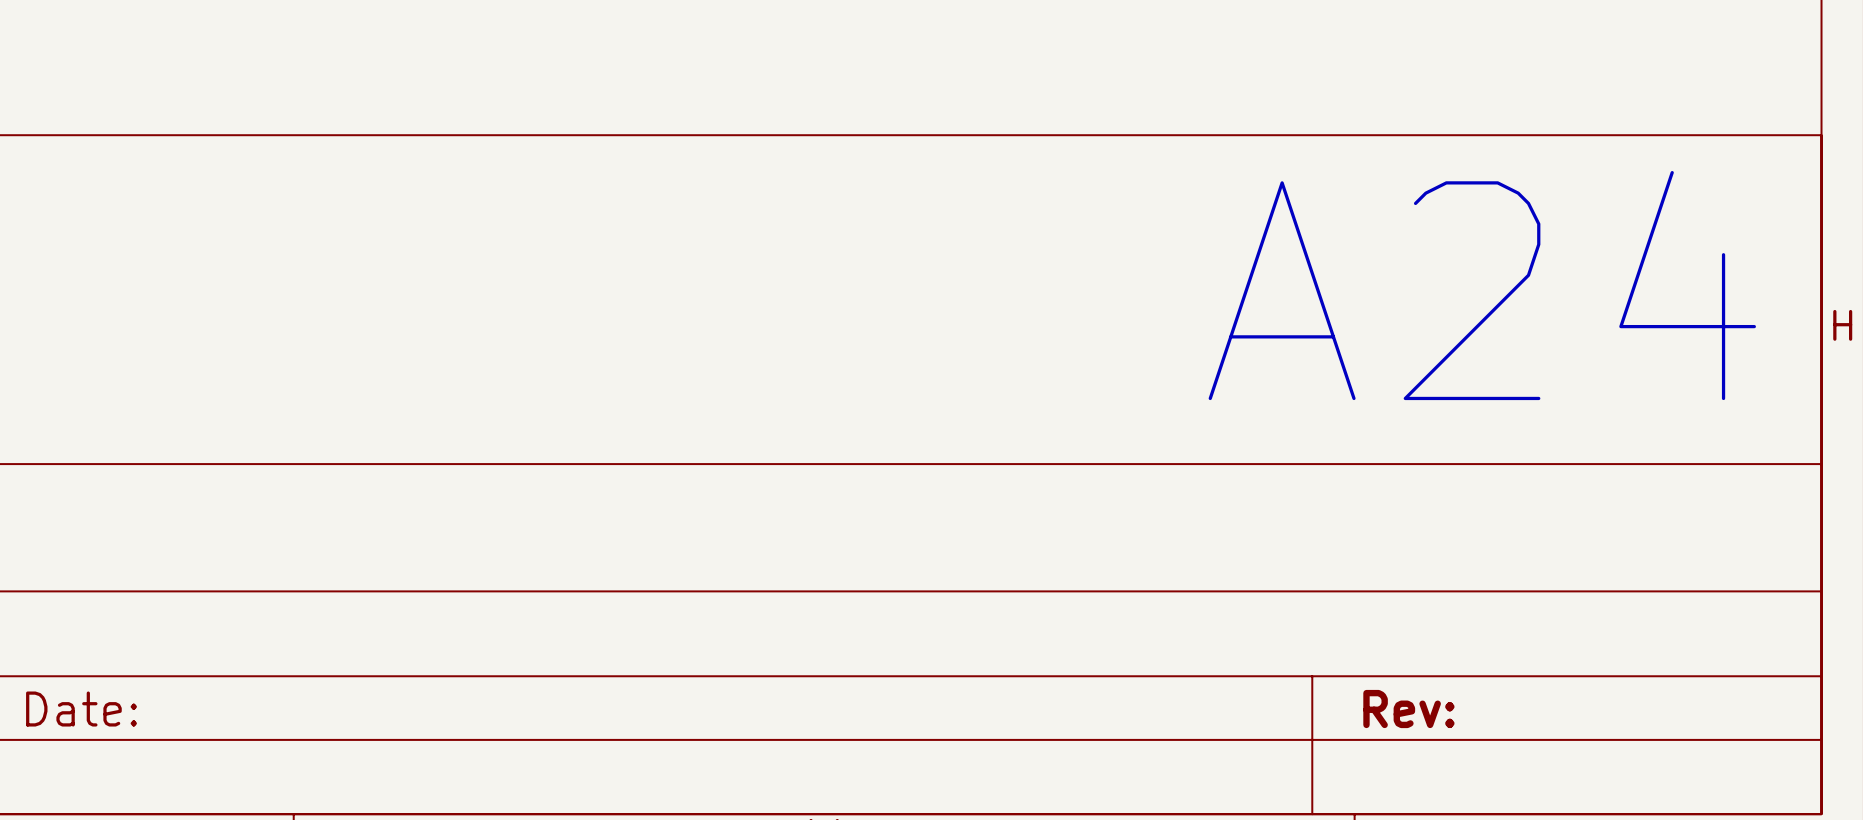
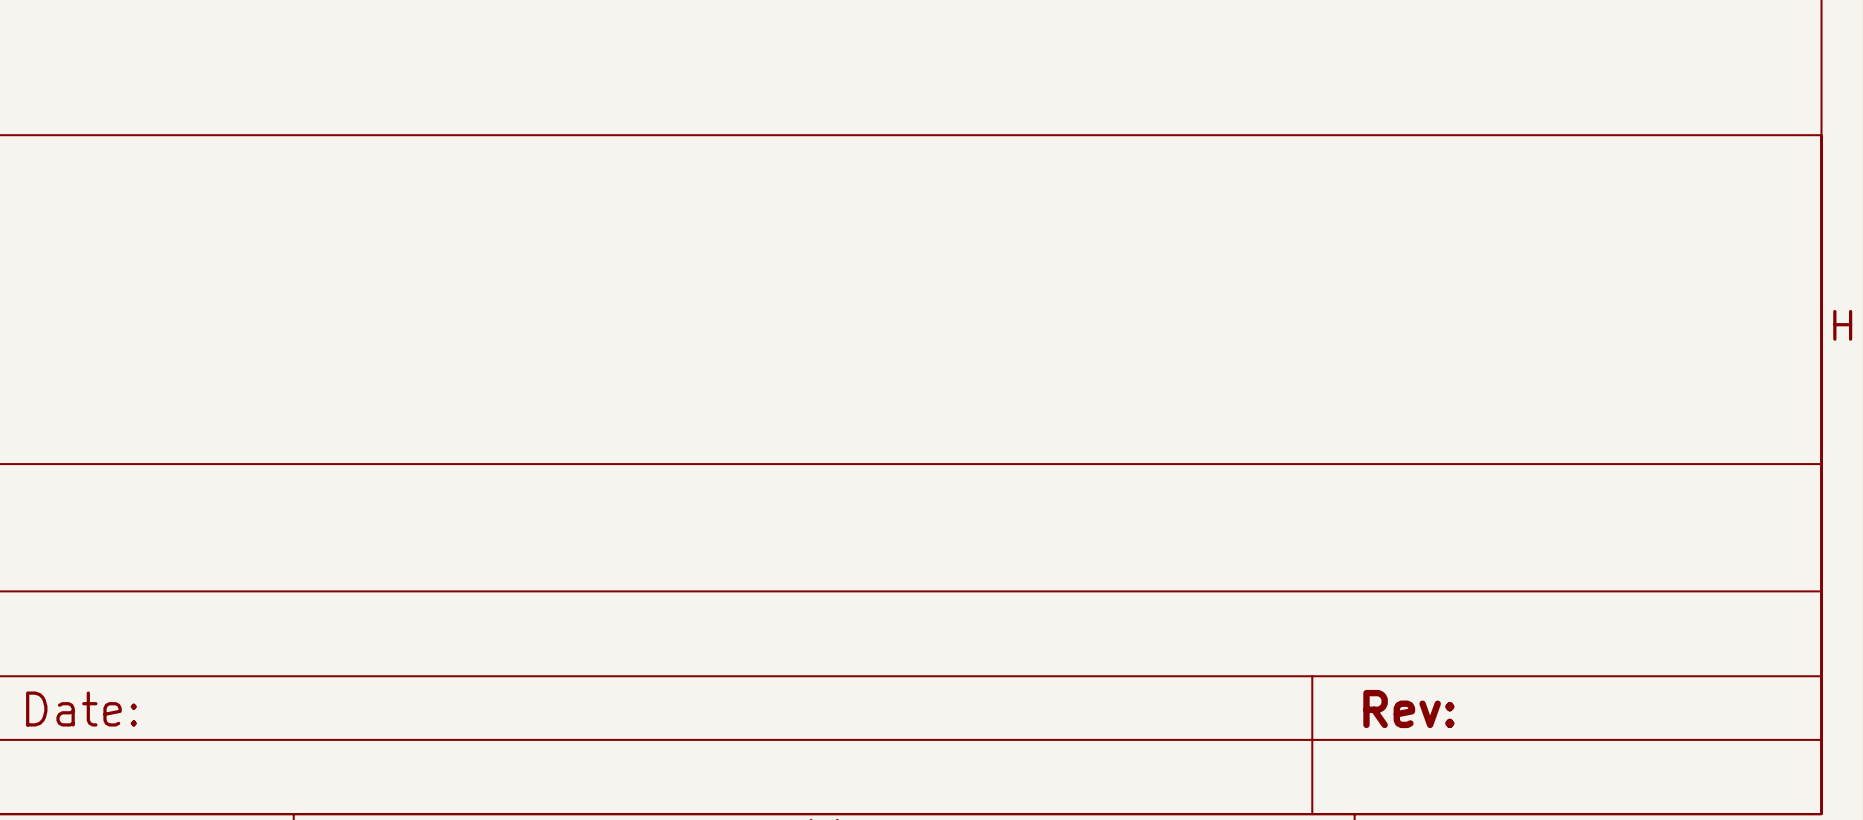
text: A24 (1482, 285) -> none

